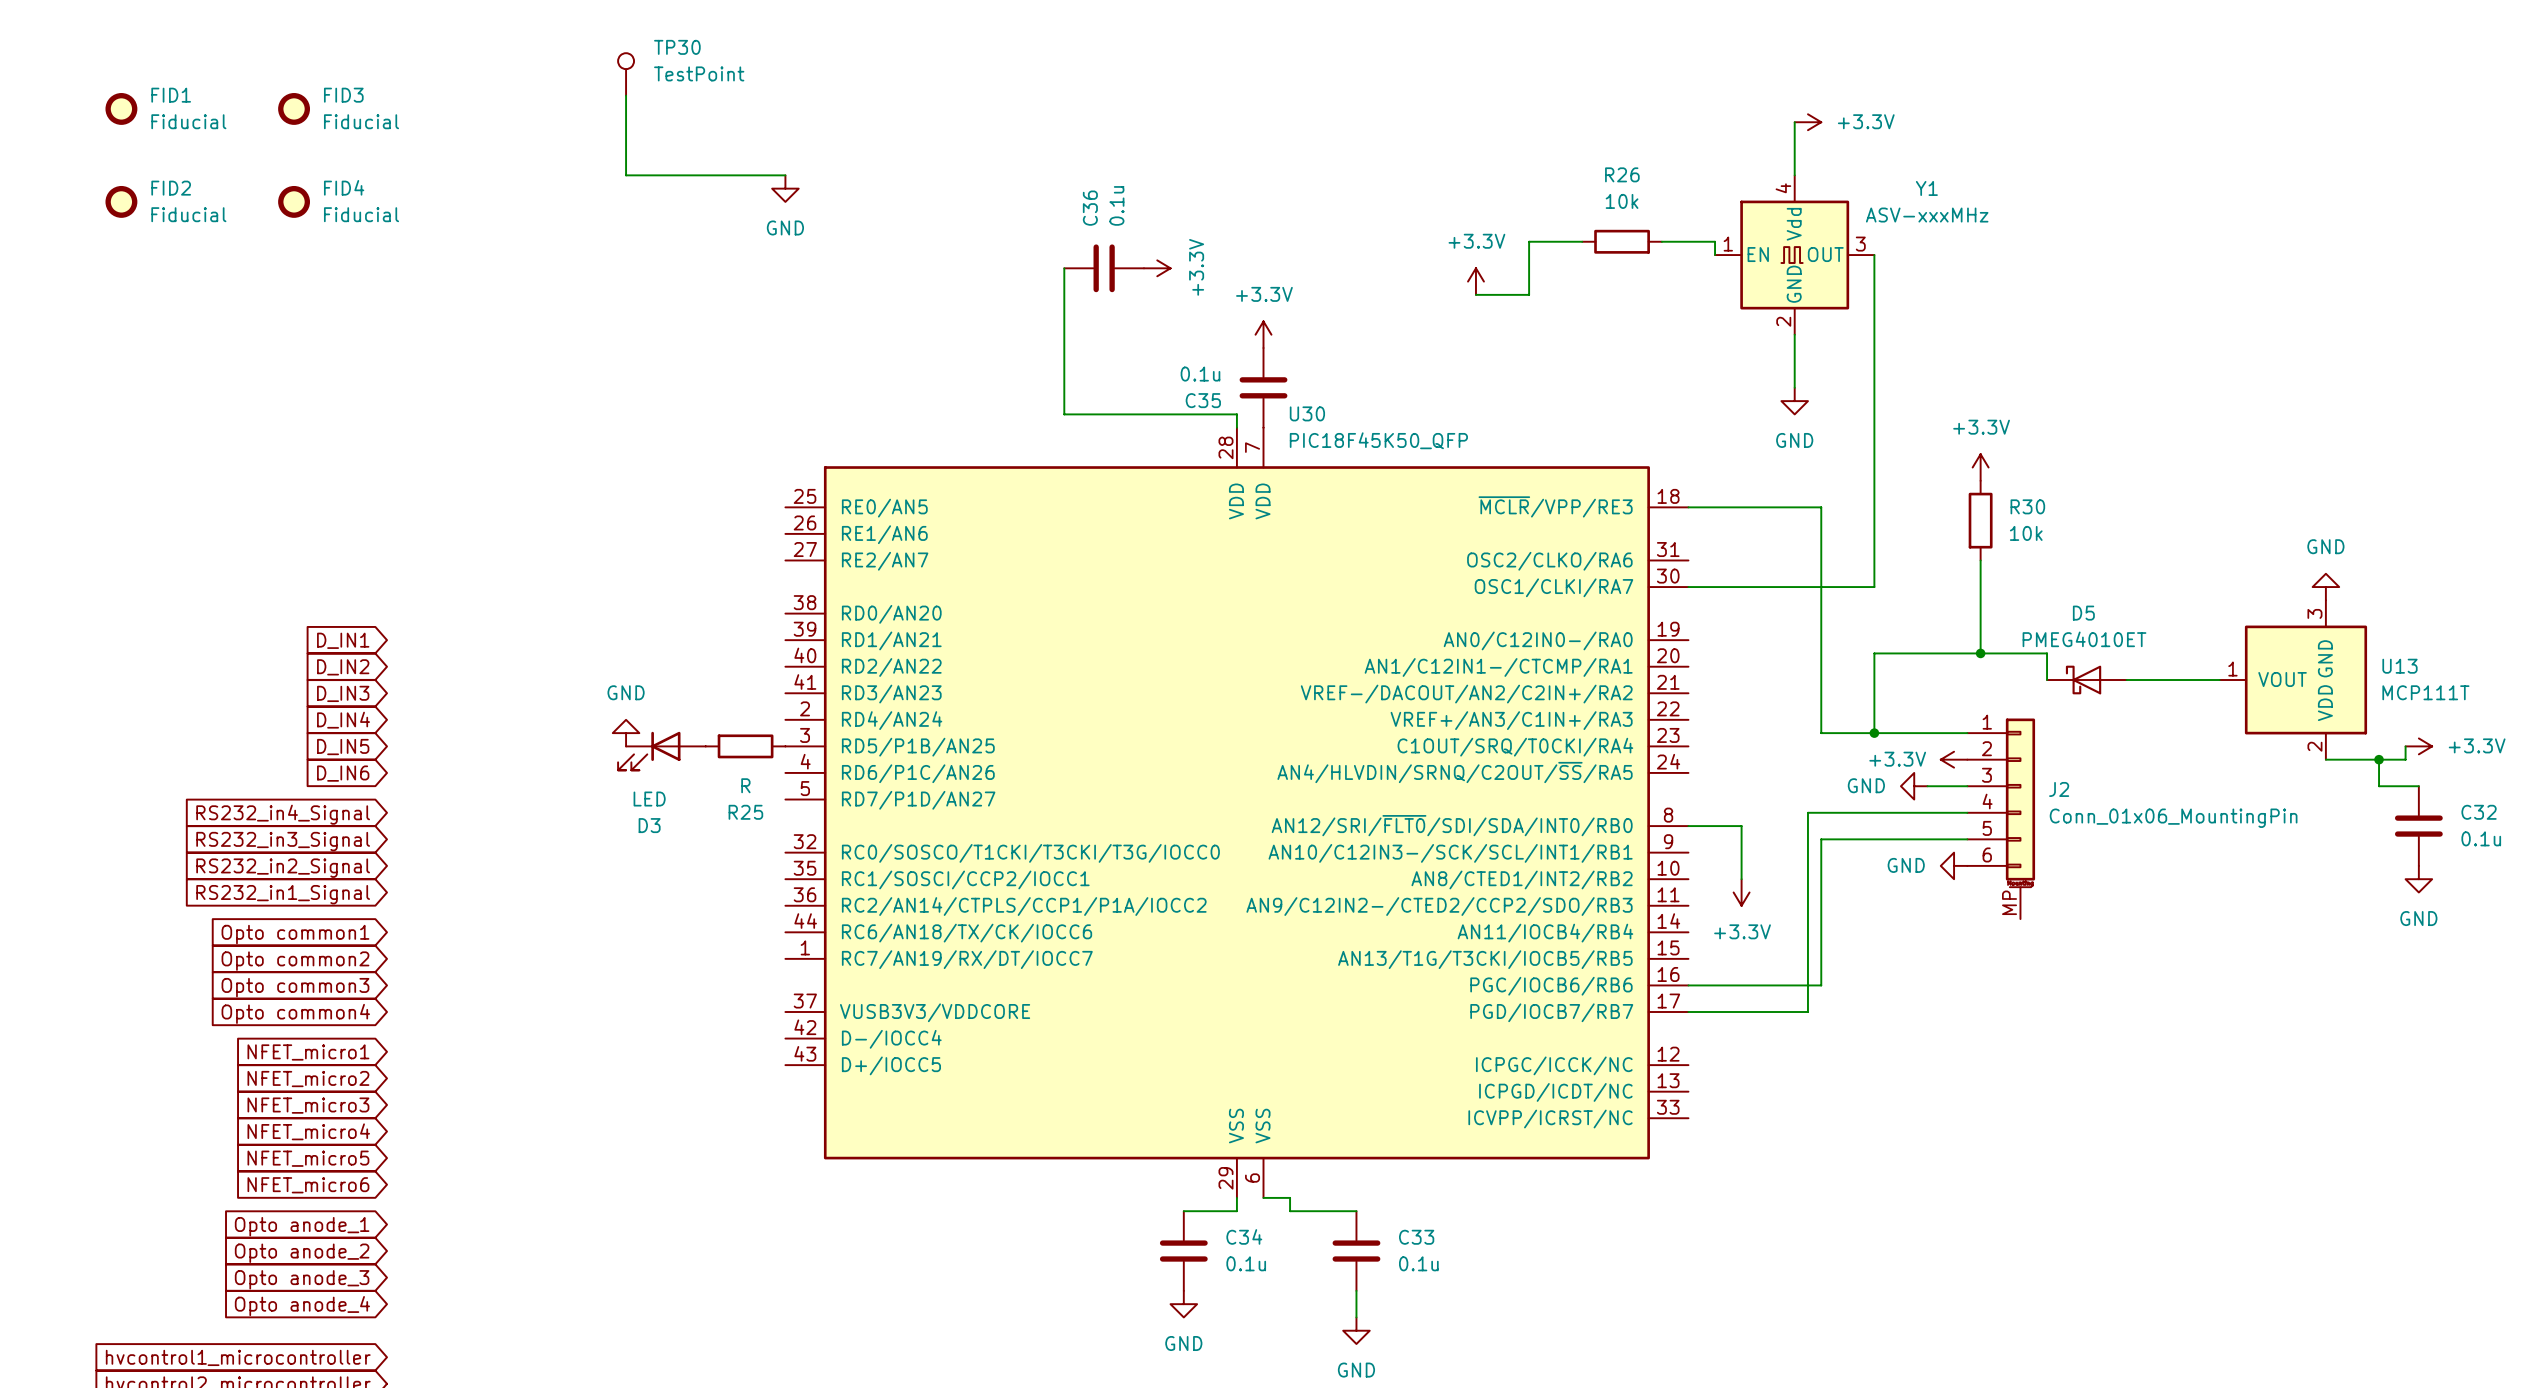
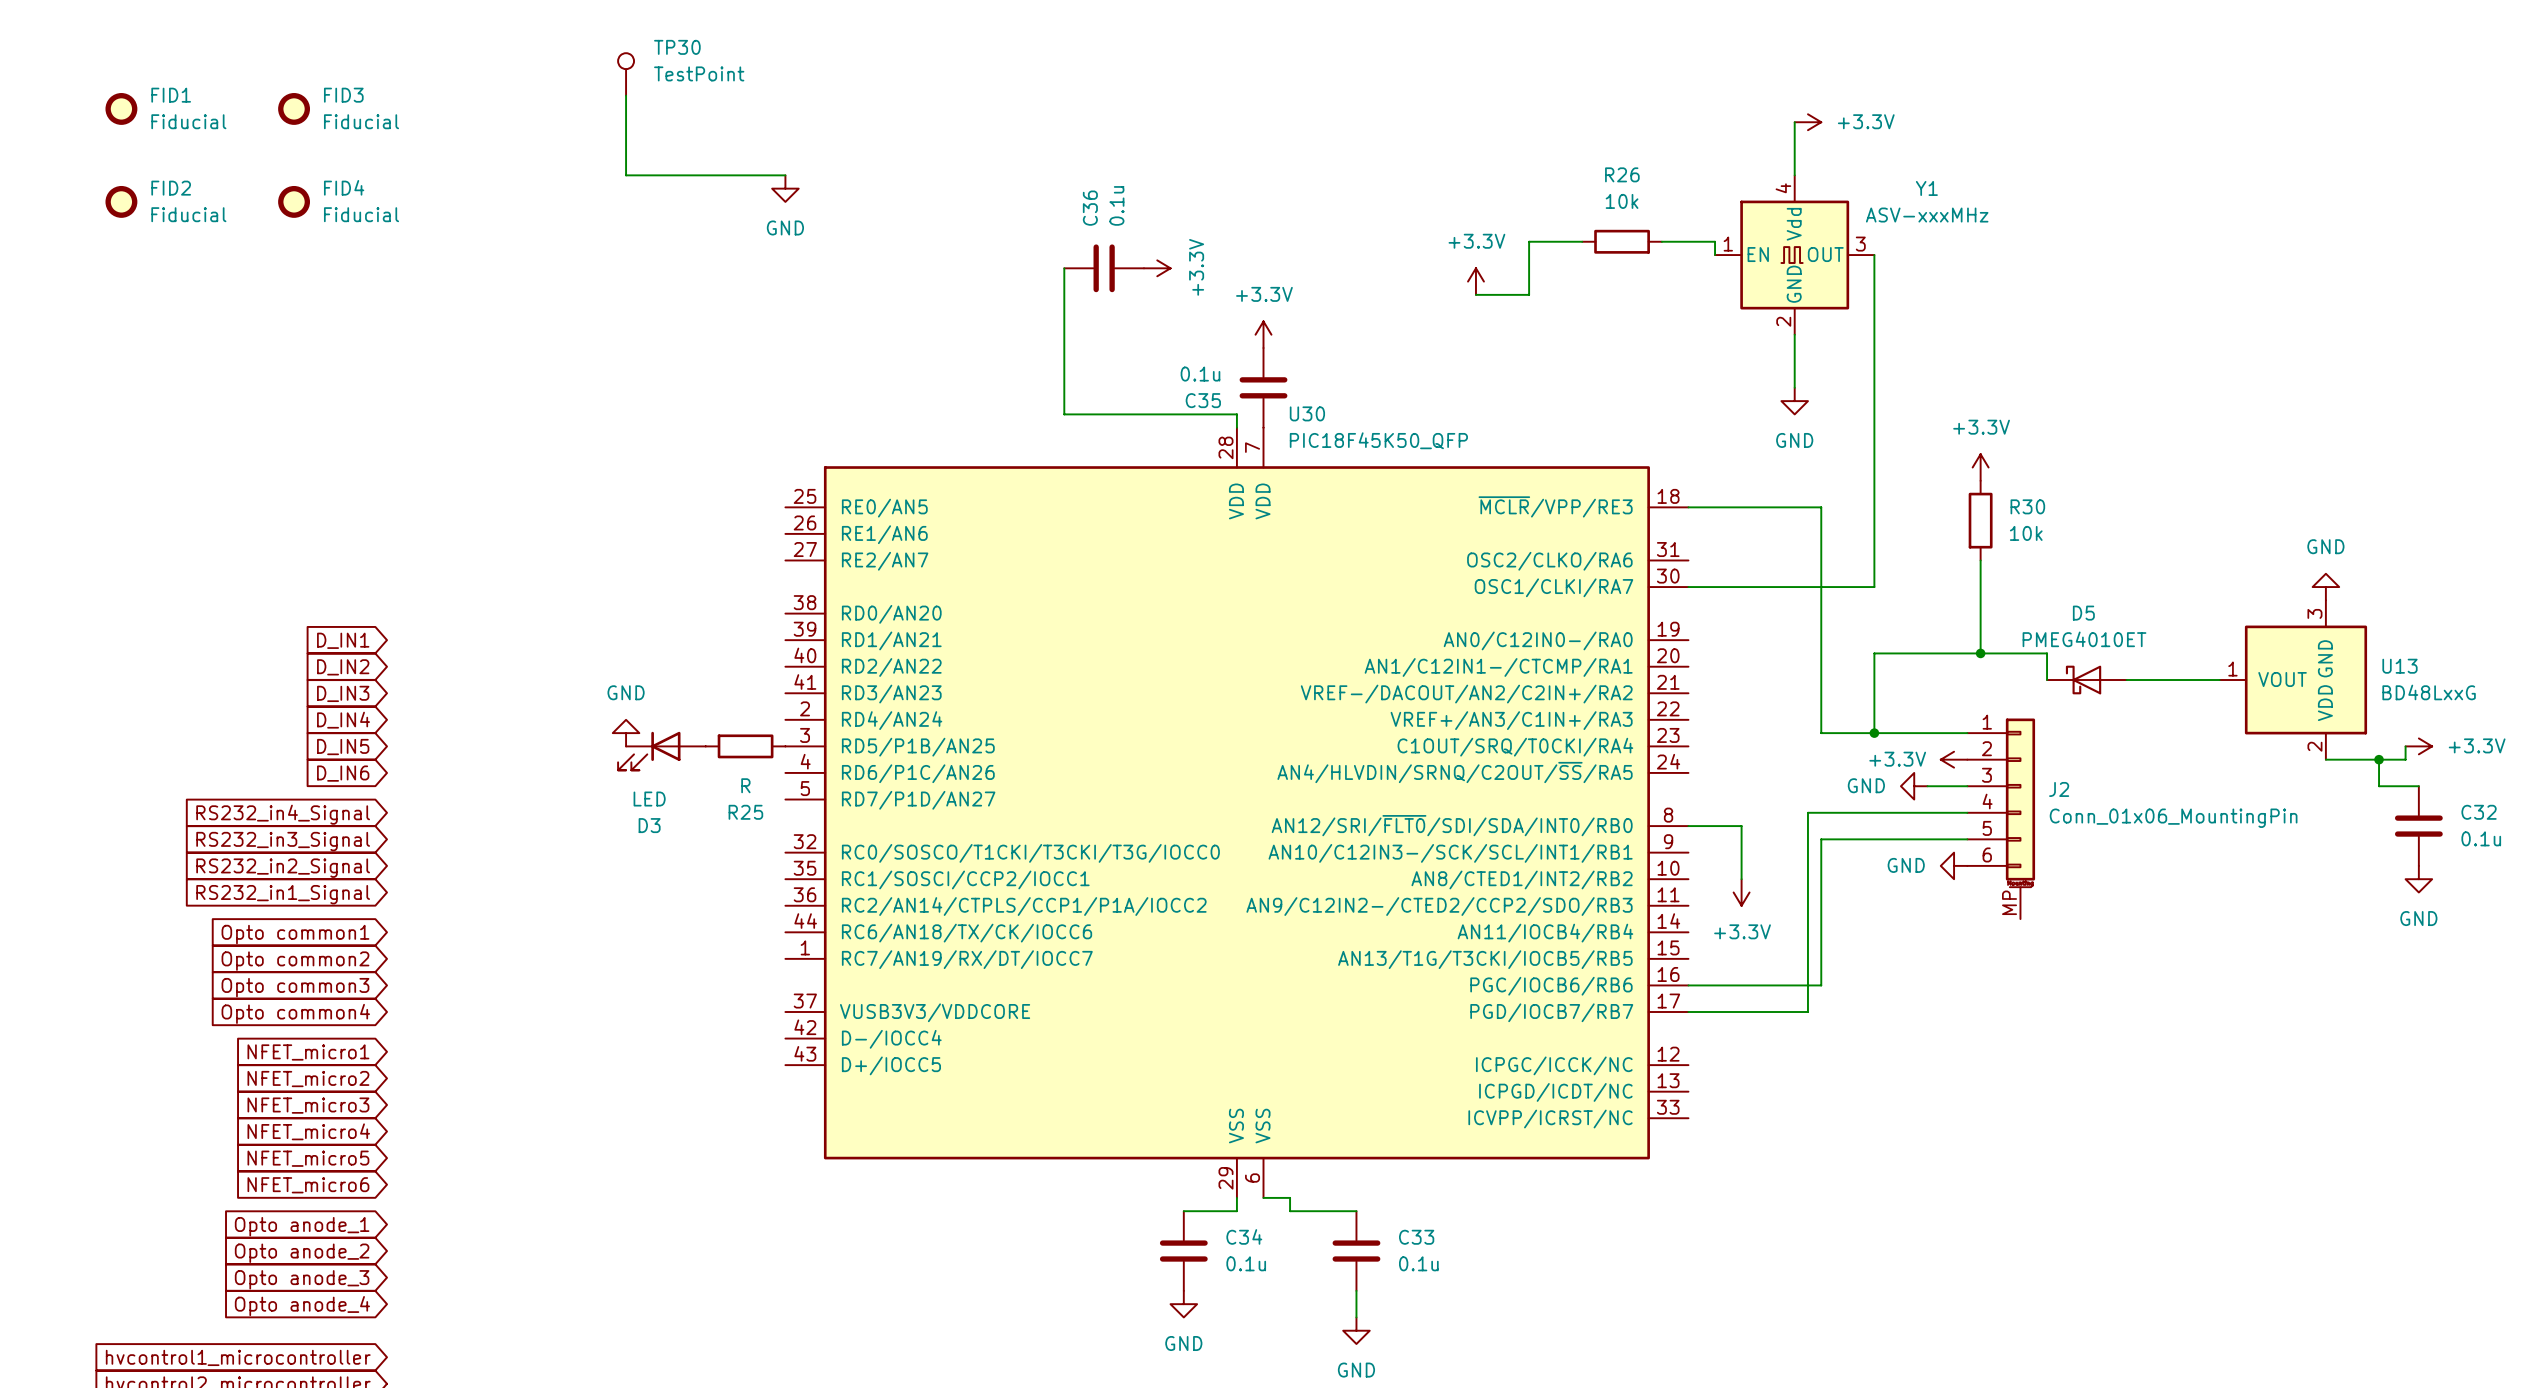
U13 value: MCP111T (2425, 692) -> BD48LxxG (2429, 692)

